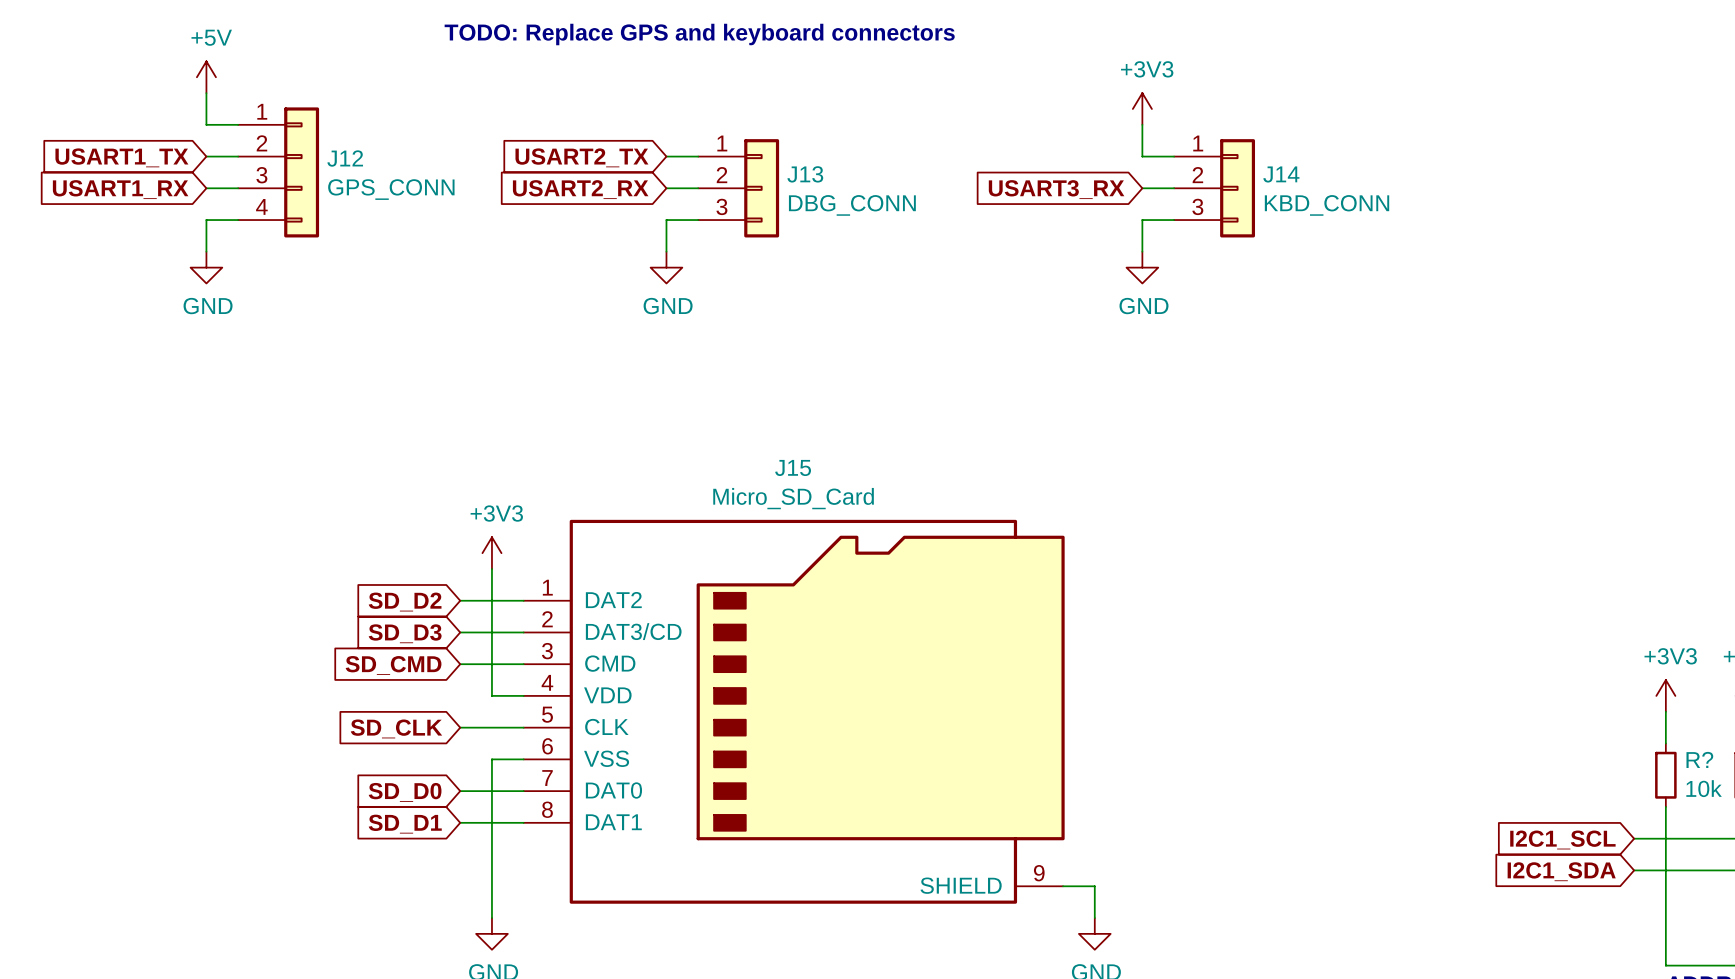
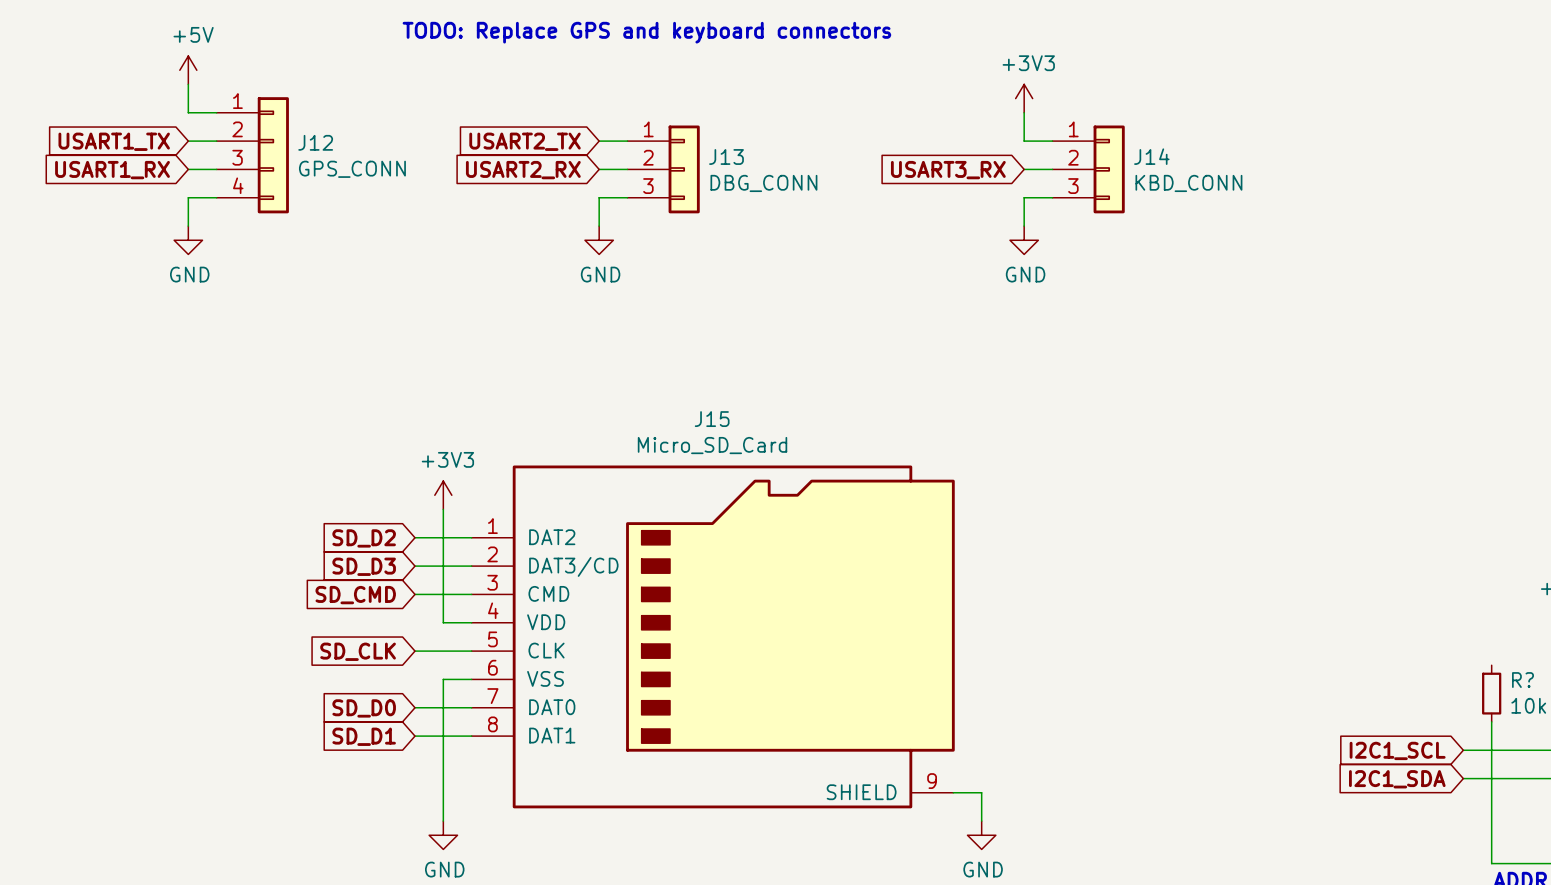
power symbol: +3V3 (1665, 695) -> none
wire: (1665, 711) (1665, 743) -> none

